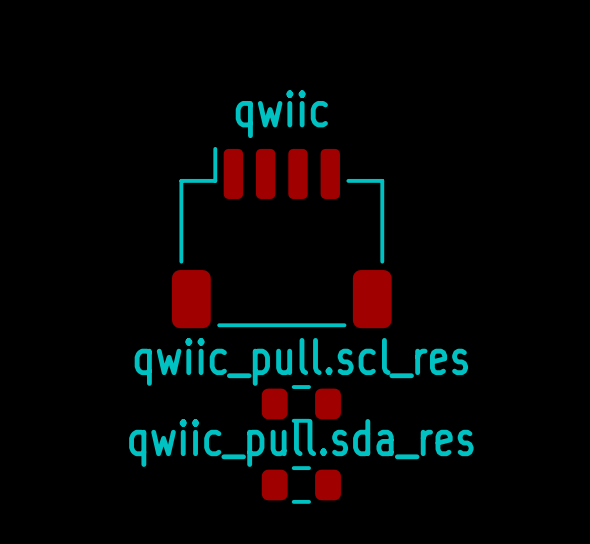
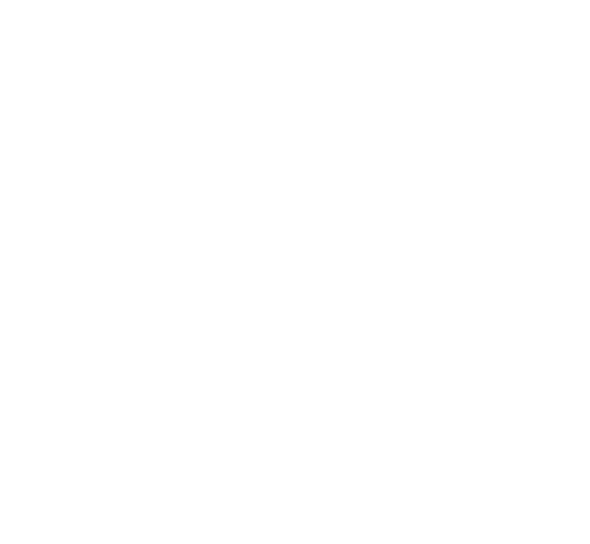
qwiic: (281, 237) -> none
qwiic_pull.scl_res: (301, 403) -> none
qwiic_pull.sda_res: (301, 484) -> none

